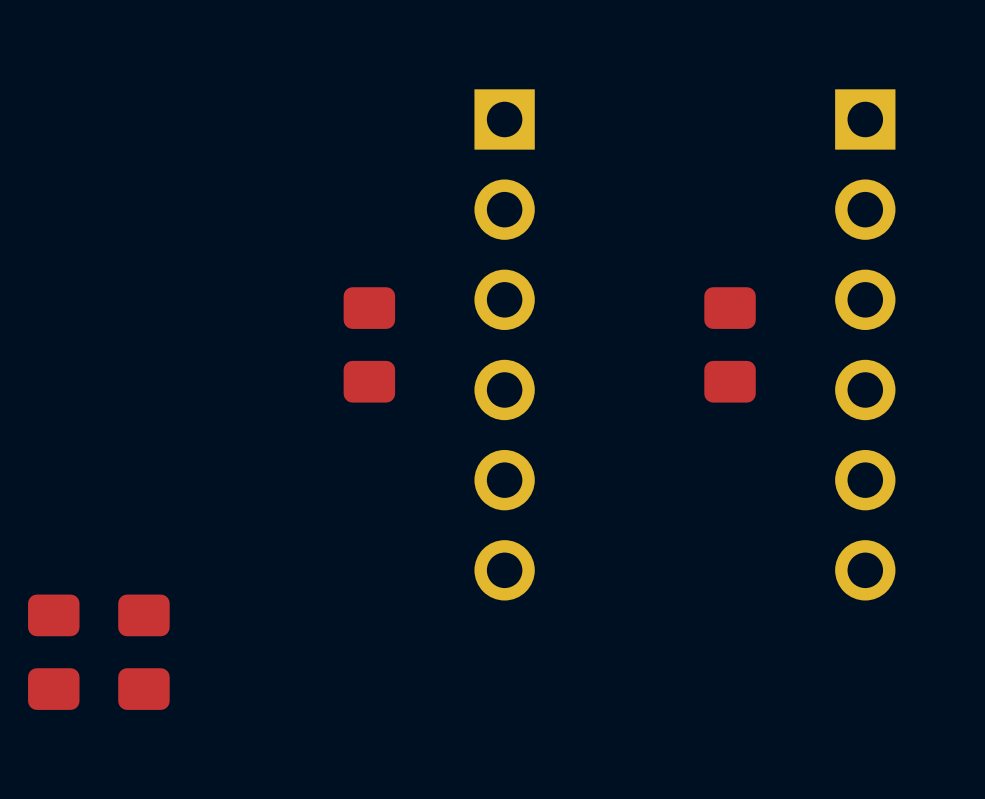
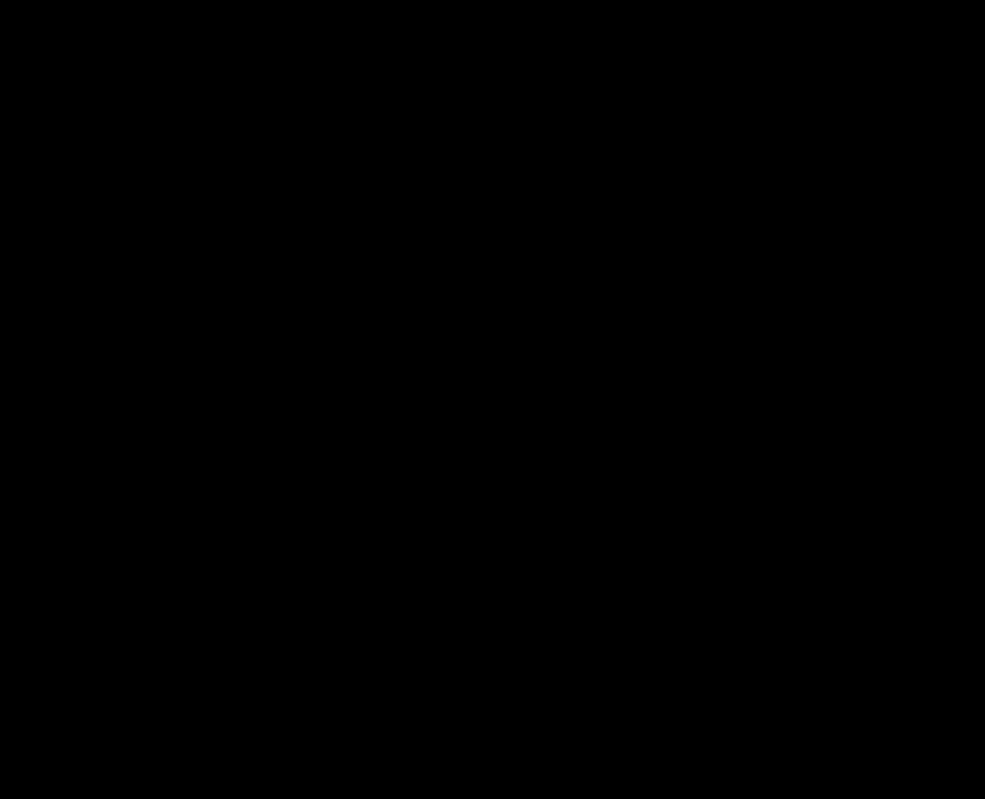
part: (369, 344) -> none
part: (504, 344) -> none
part: (730, 344) -> none
part: (865, 344) -> none
part: (53, 652) -> none
part: (143, 652) -> none

